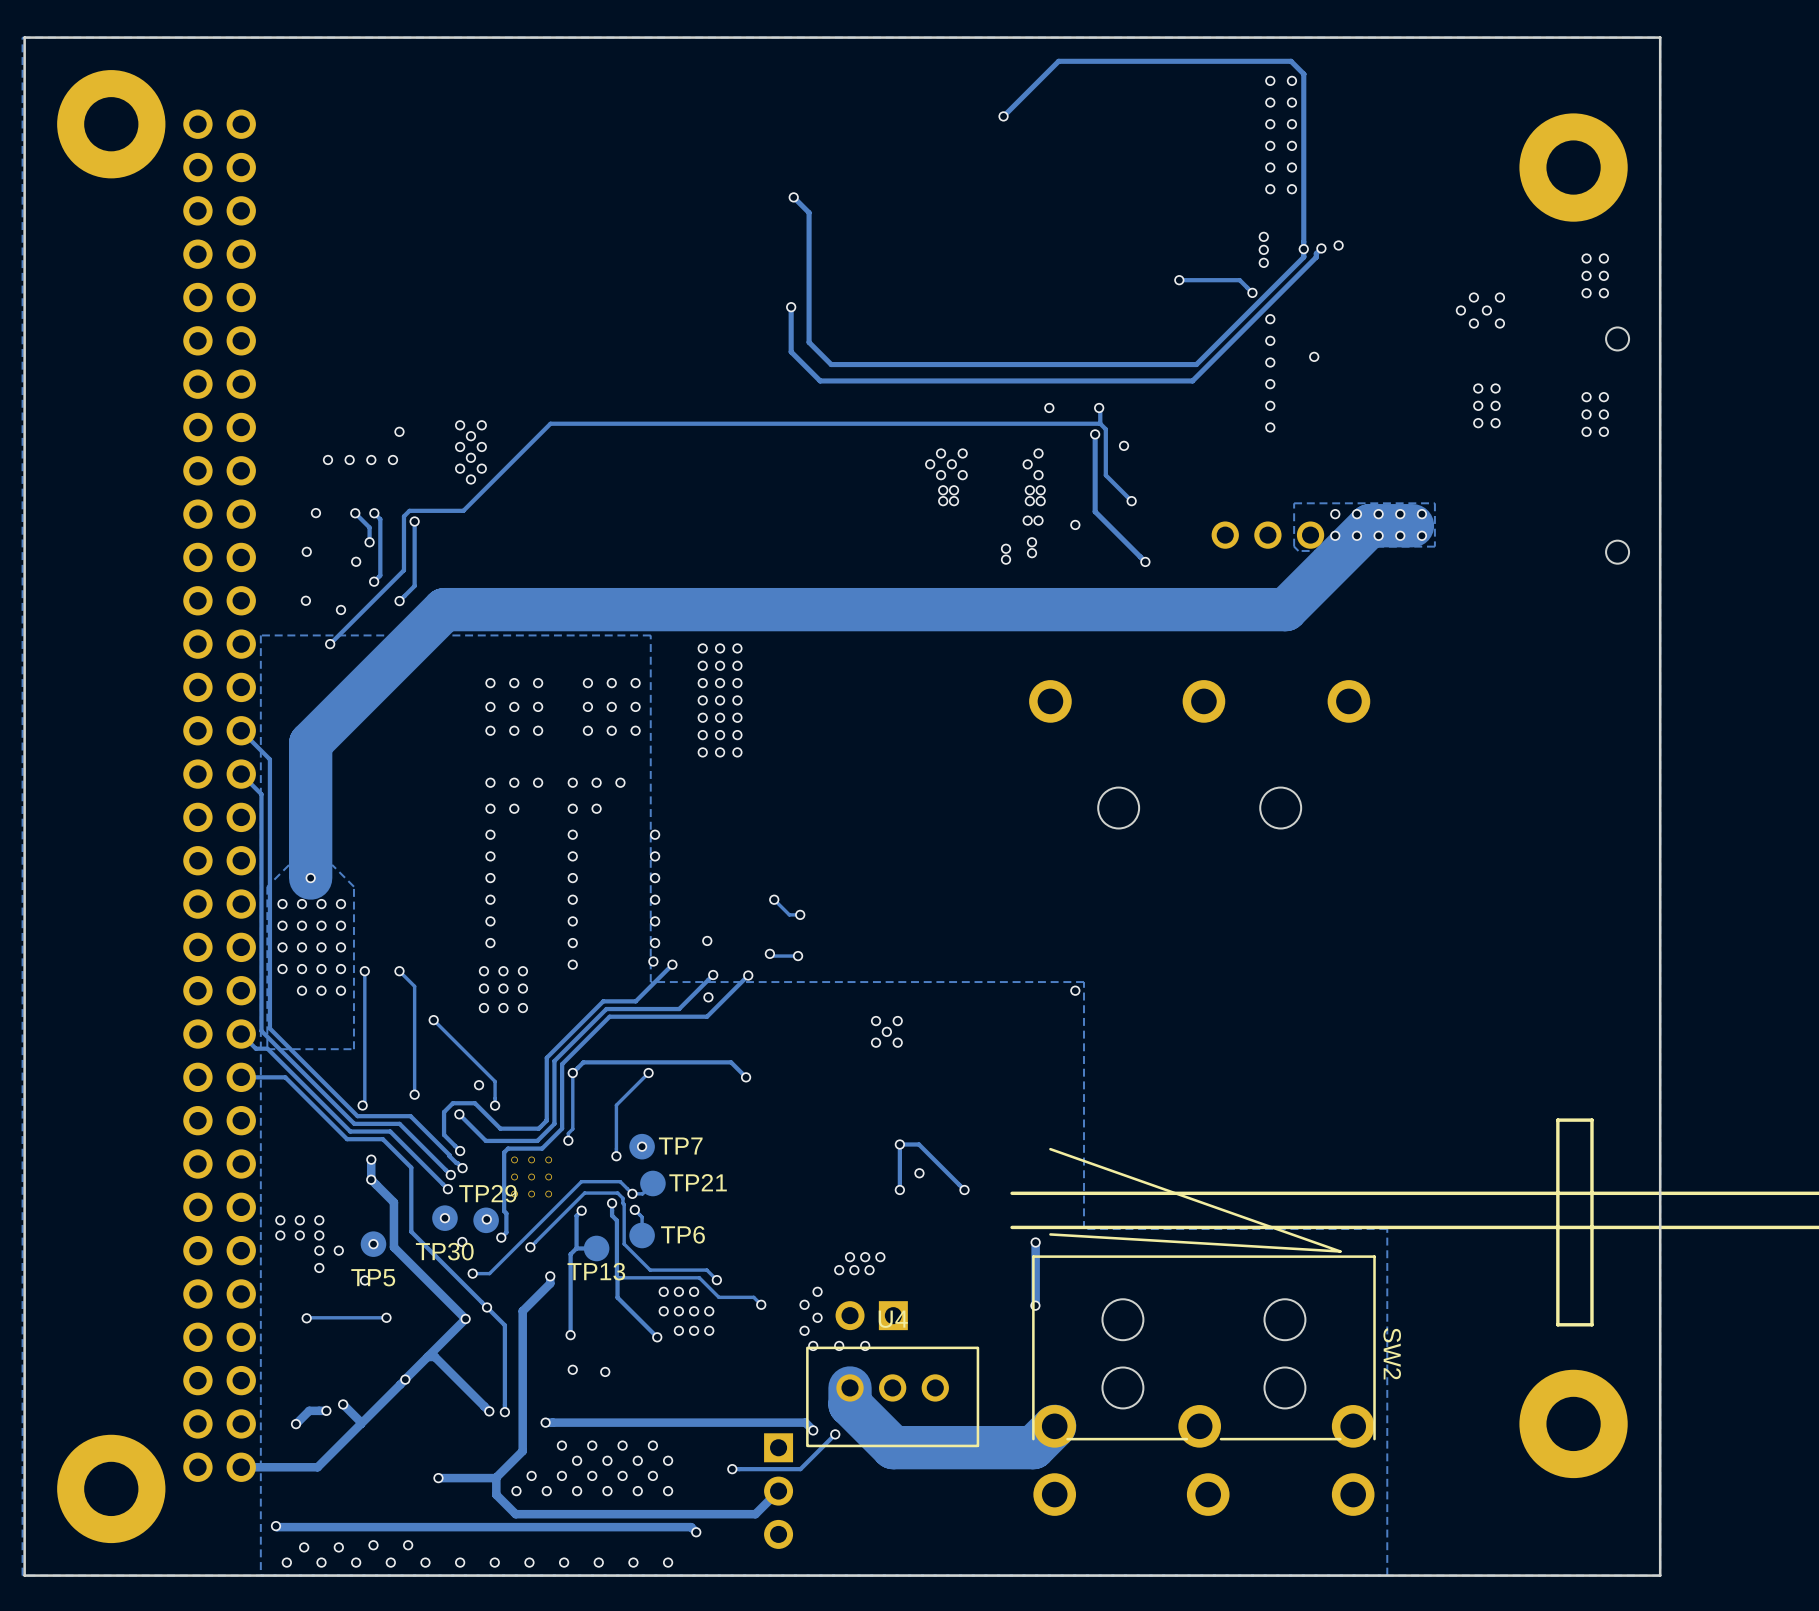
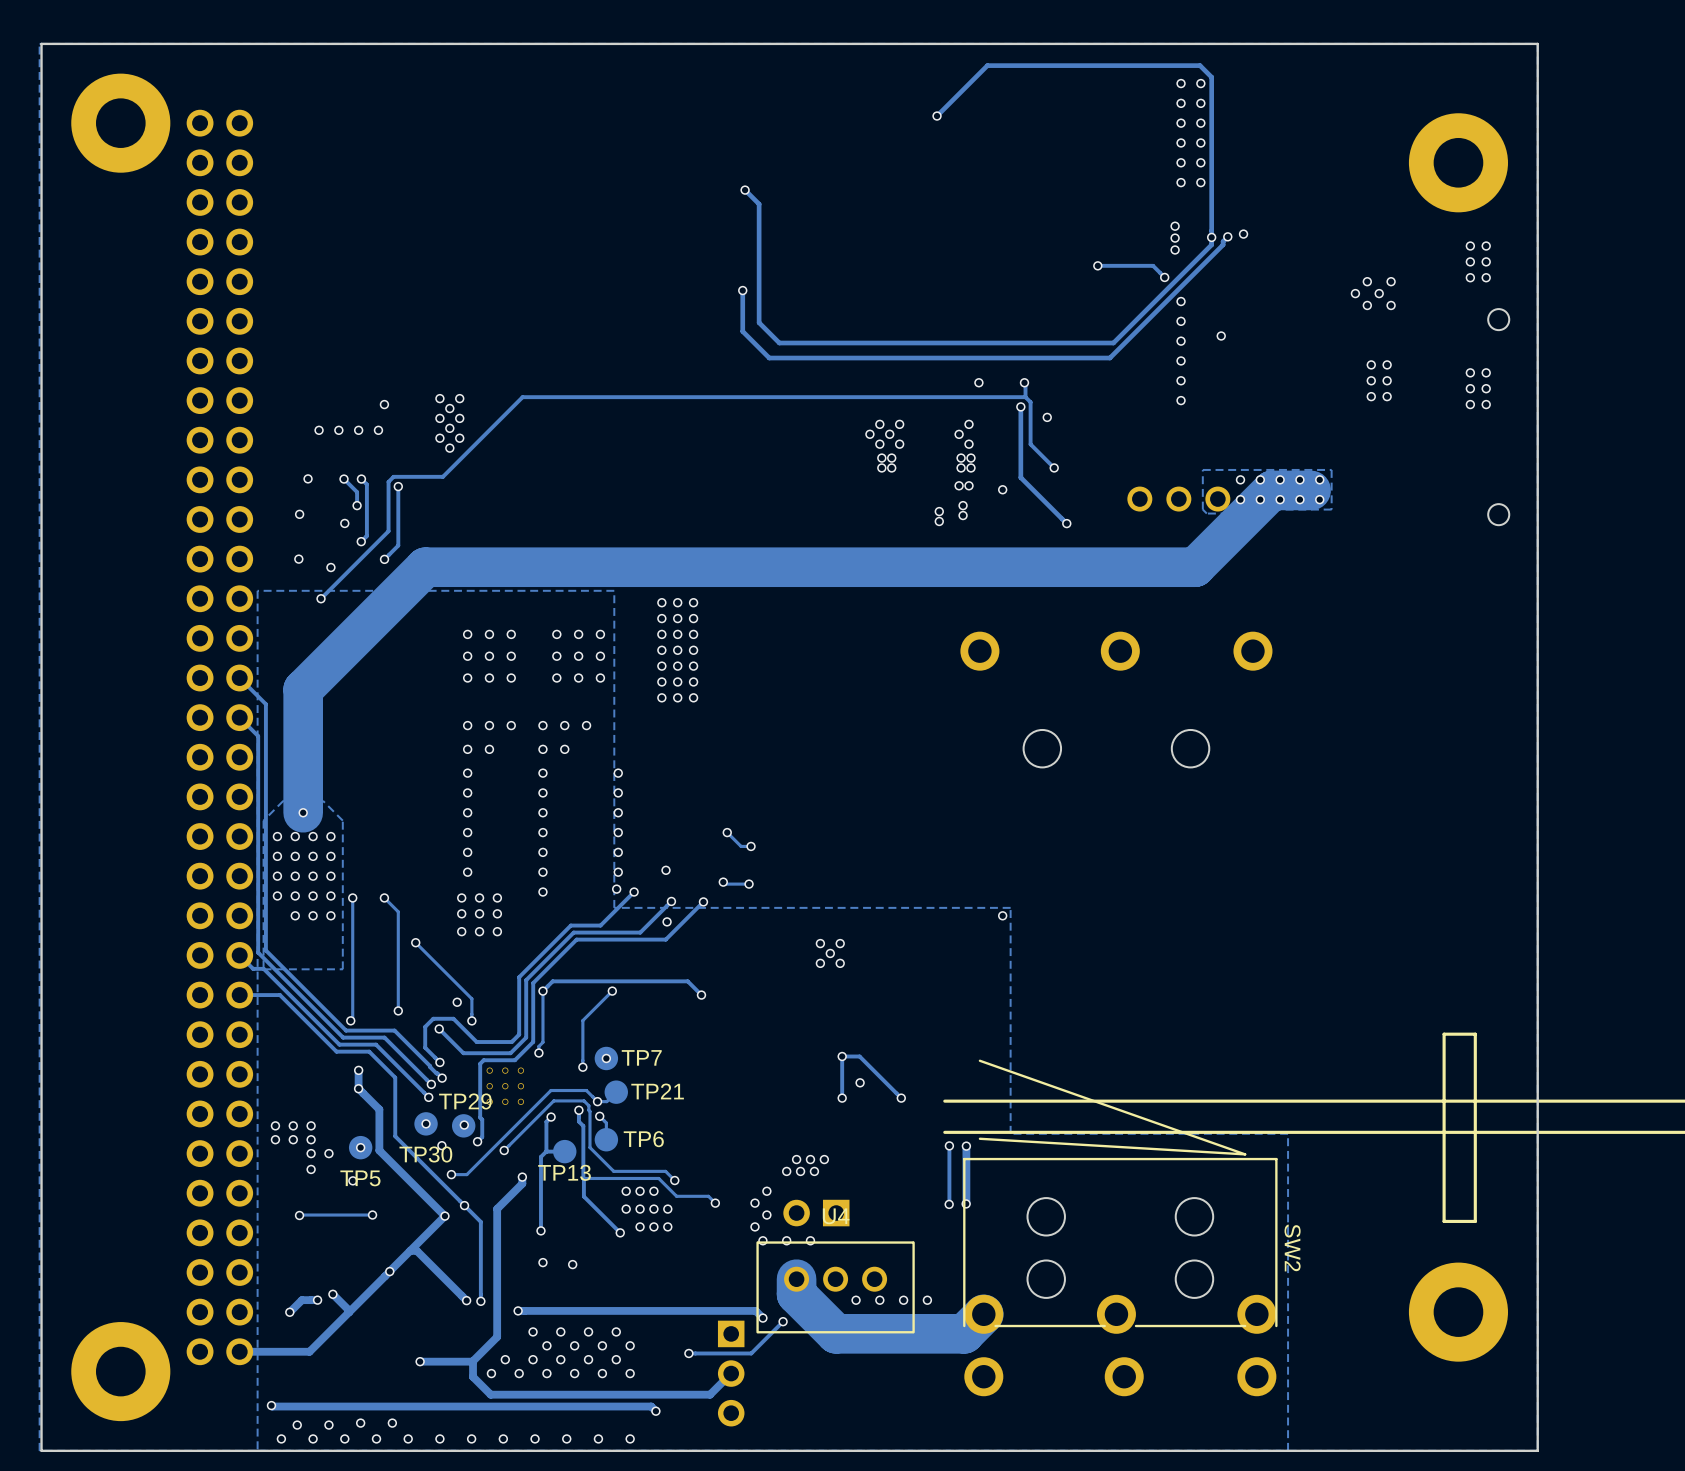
track: none -> (949, 1145) (949, 1204)
via: none -> (949, 1145)
via: none -> (949, 1204)
via: none -> (856, 1300)
via: none -> (879, 1300)
via: none -> (903, 1300)
via: none -> (927, 1300)

